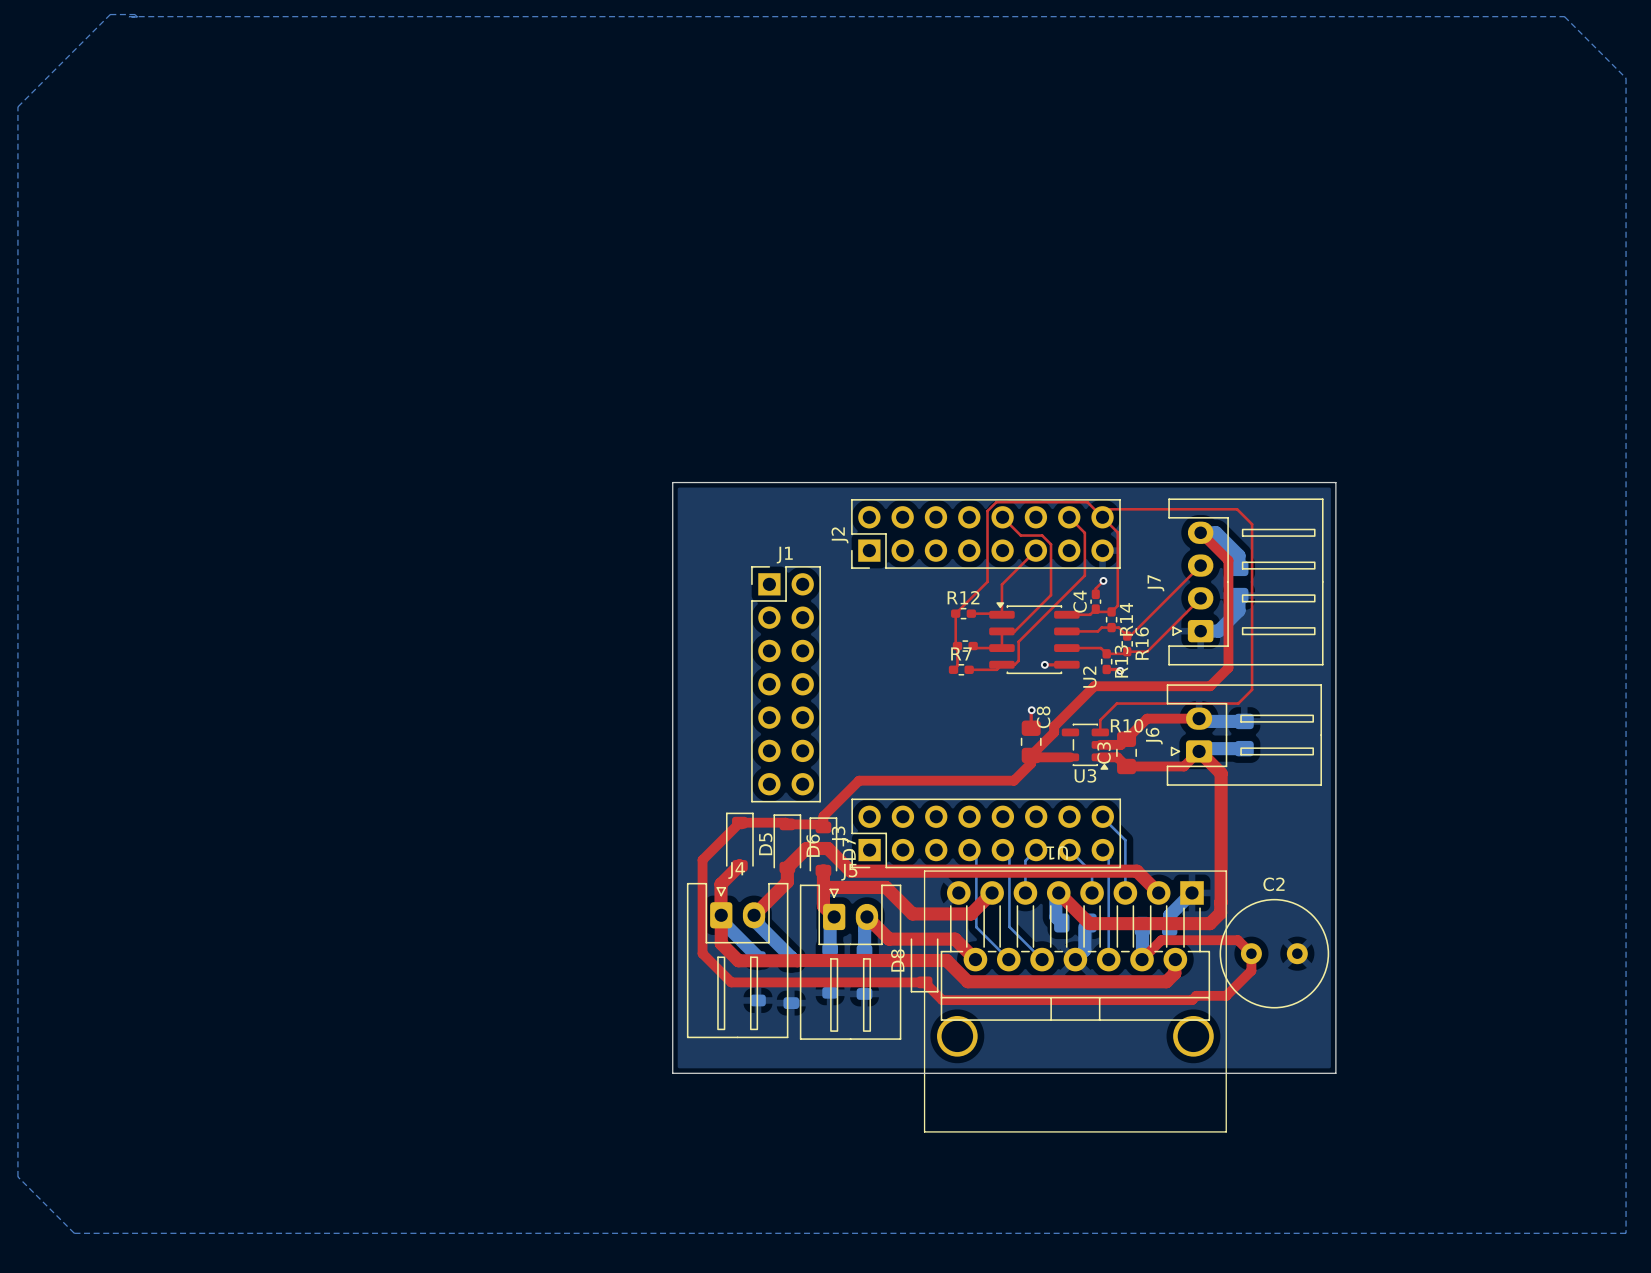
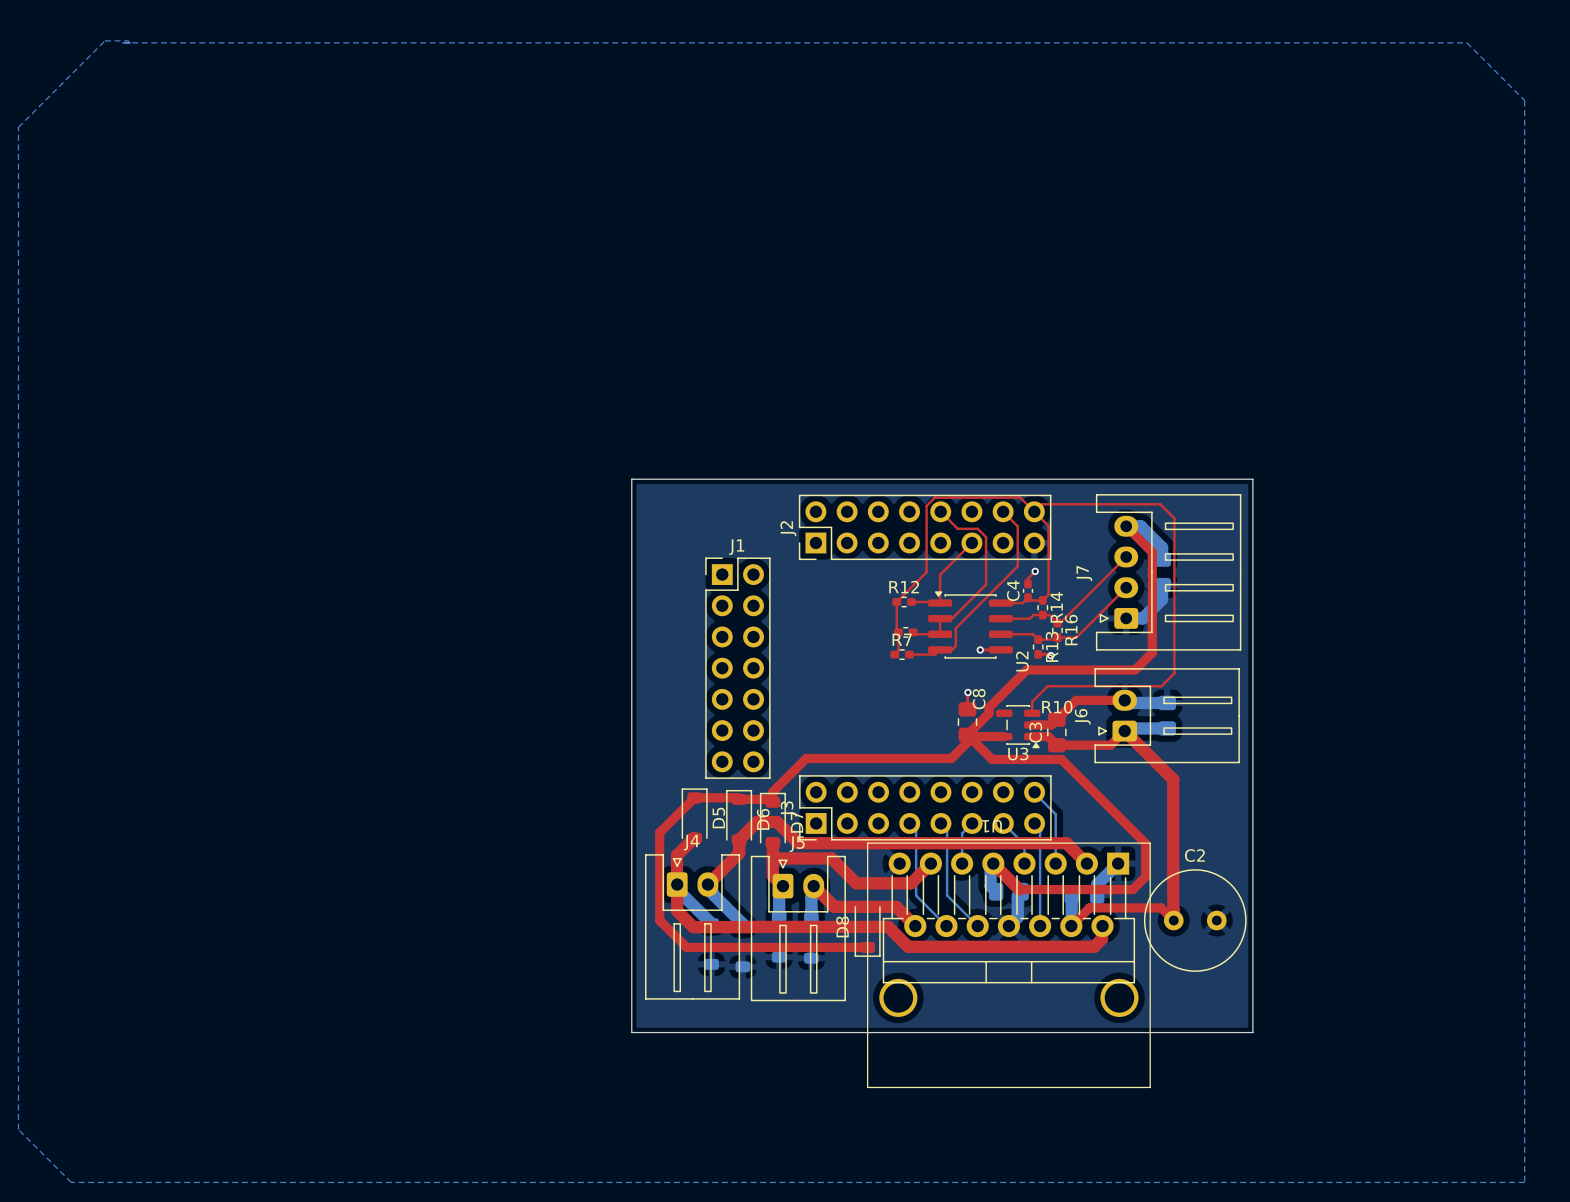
top track: none -> (969, 736) (992, 759) (1061, 759) (1145, 843) (1145, 876) (1132, 889) (1019, 889)
top track: (1221, 773) (1220, 912) (1209, 923) (1089, 923) (1086, 920) -> (1145, 751) (1173, 779) (1173, 920)
top track: (1251, 953) (1251, 970) (1226, 995) (1196, 995) -> none
top track: (924, 982) (942, 1000) (1192, 1000) (1196, 995) -> none

